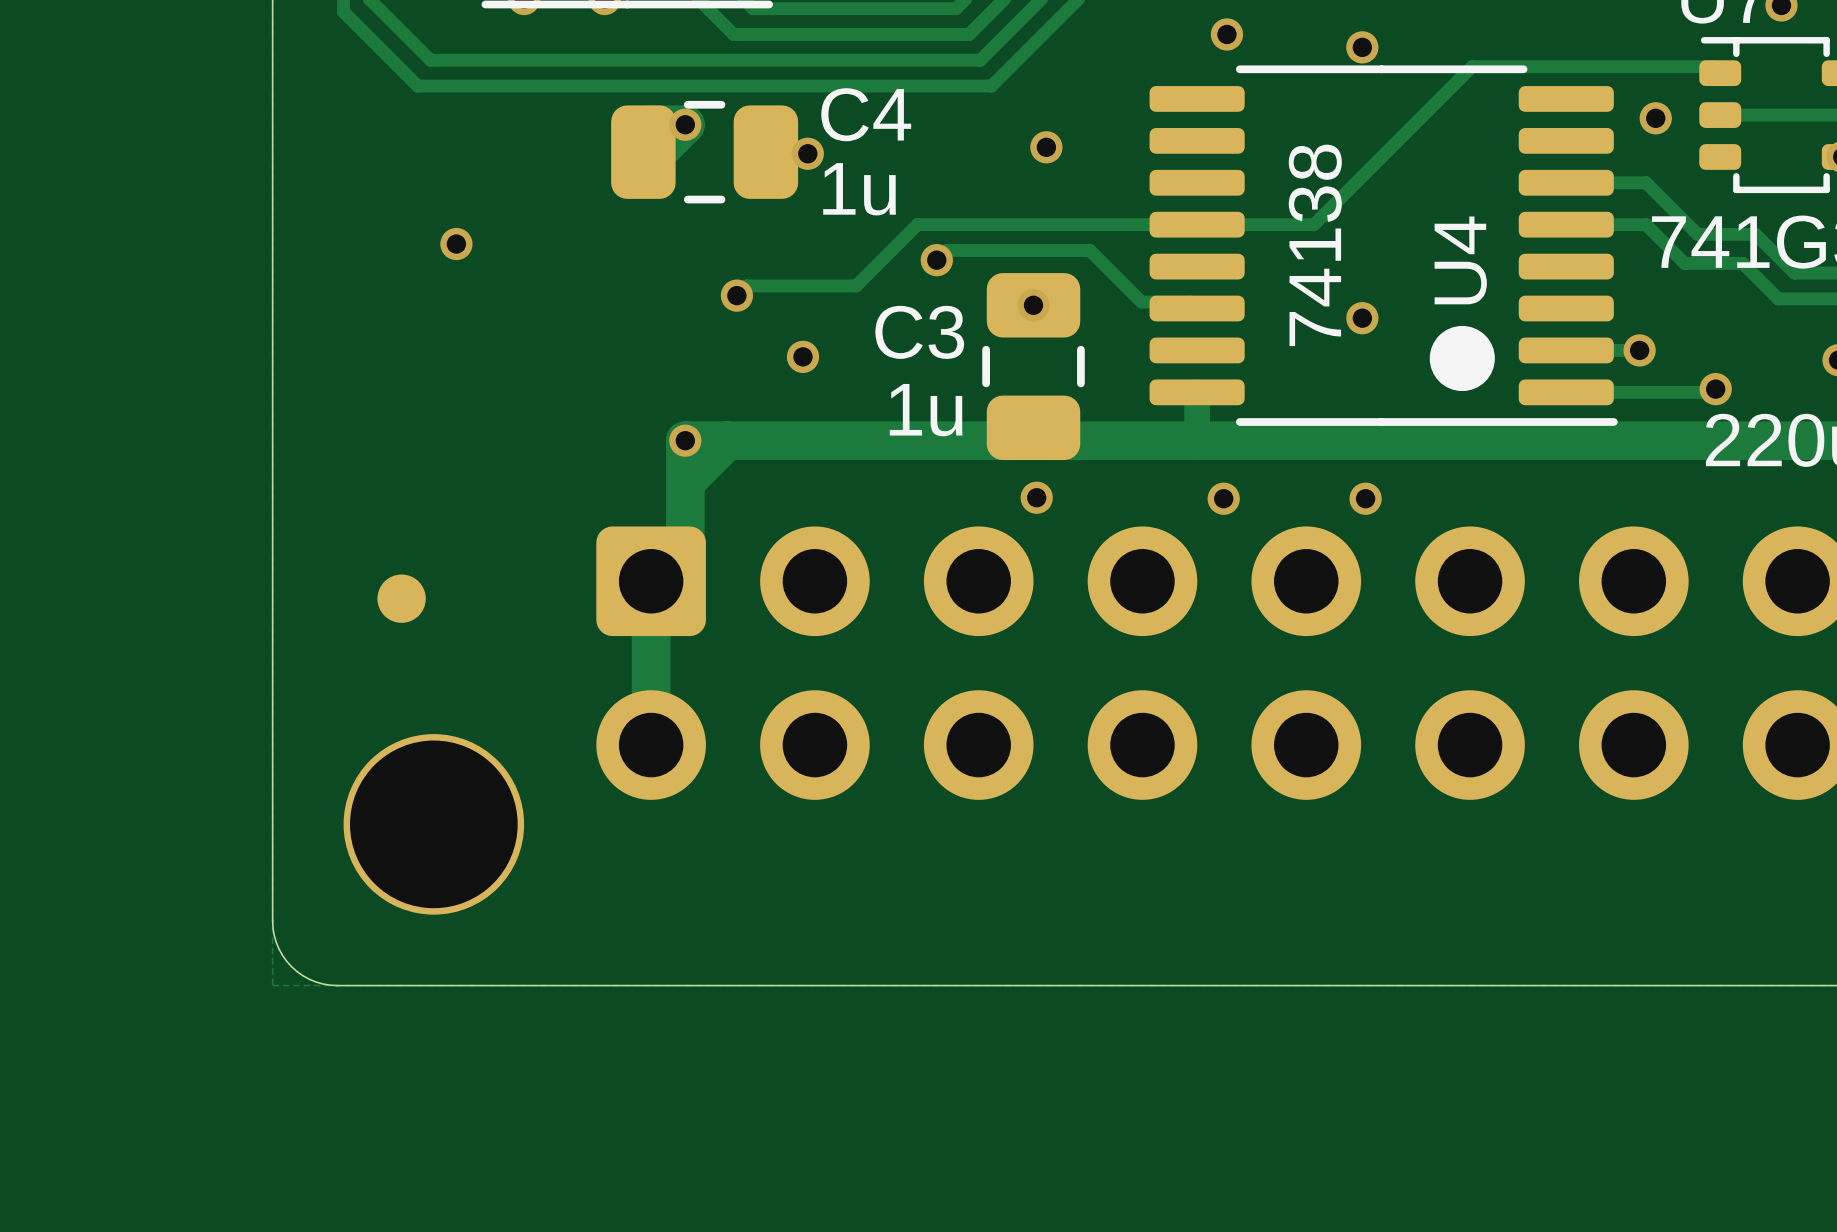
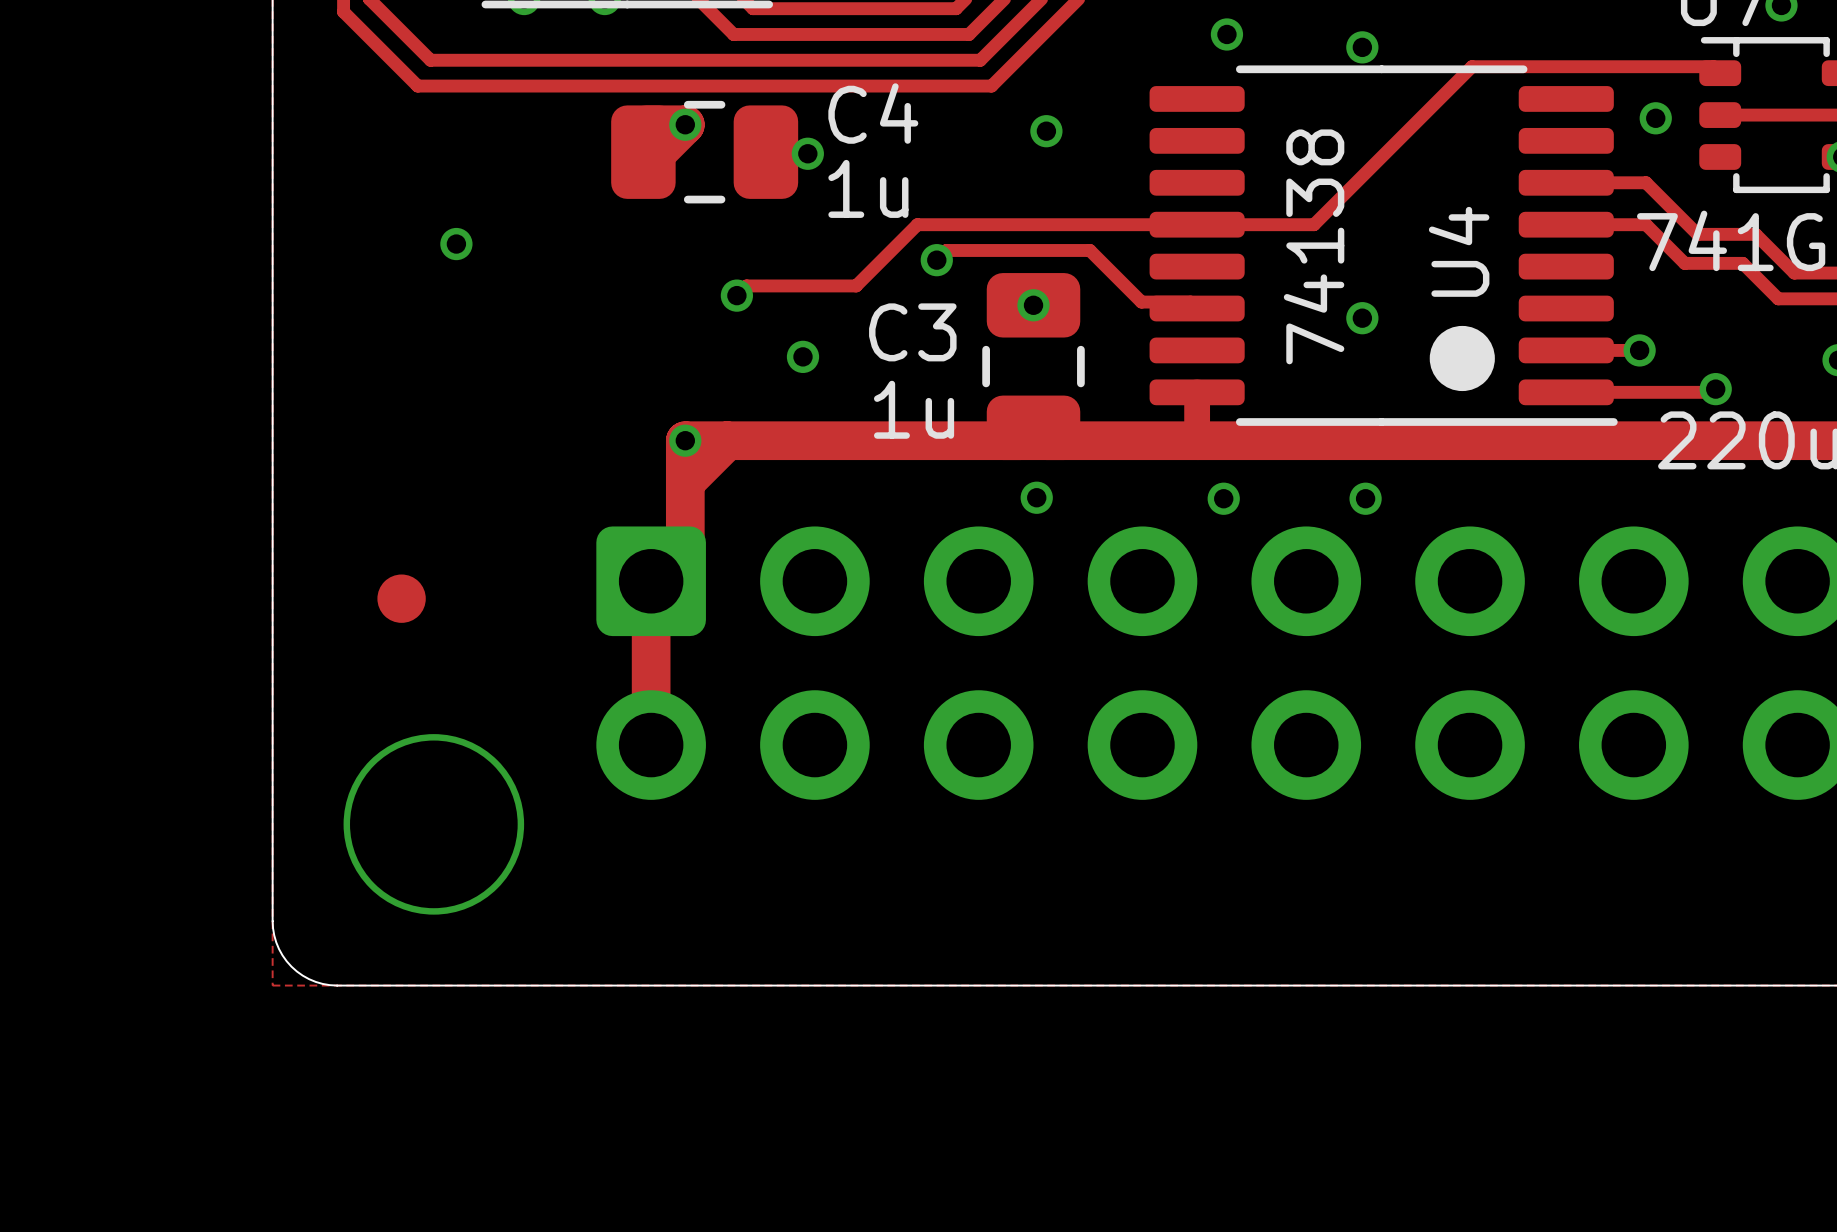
via position: (1046, 147) -> (1046, 131)

